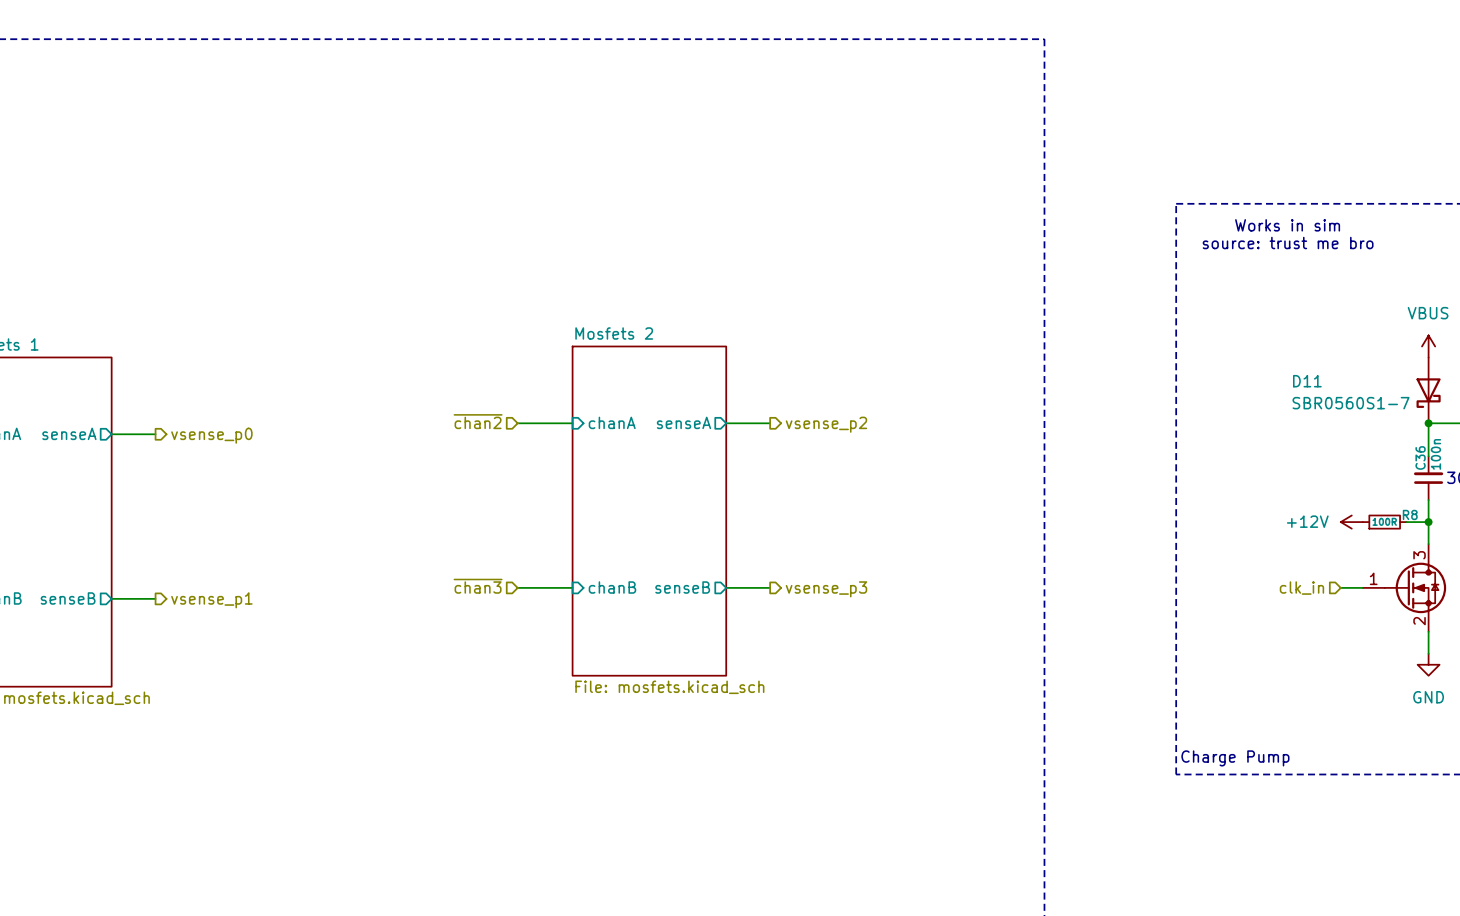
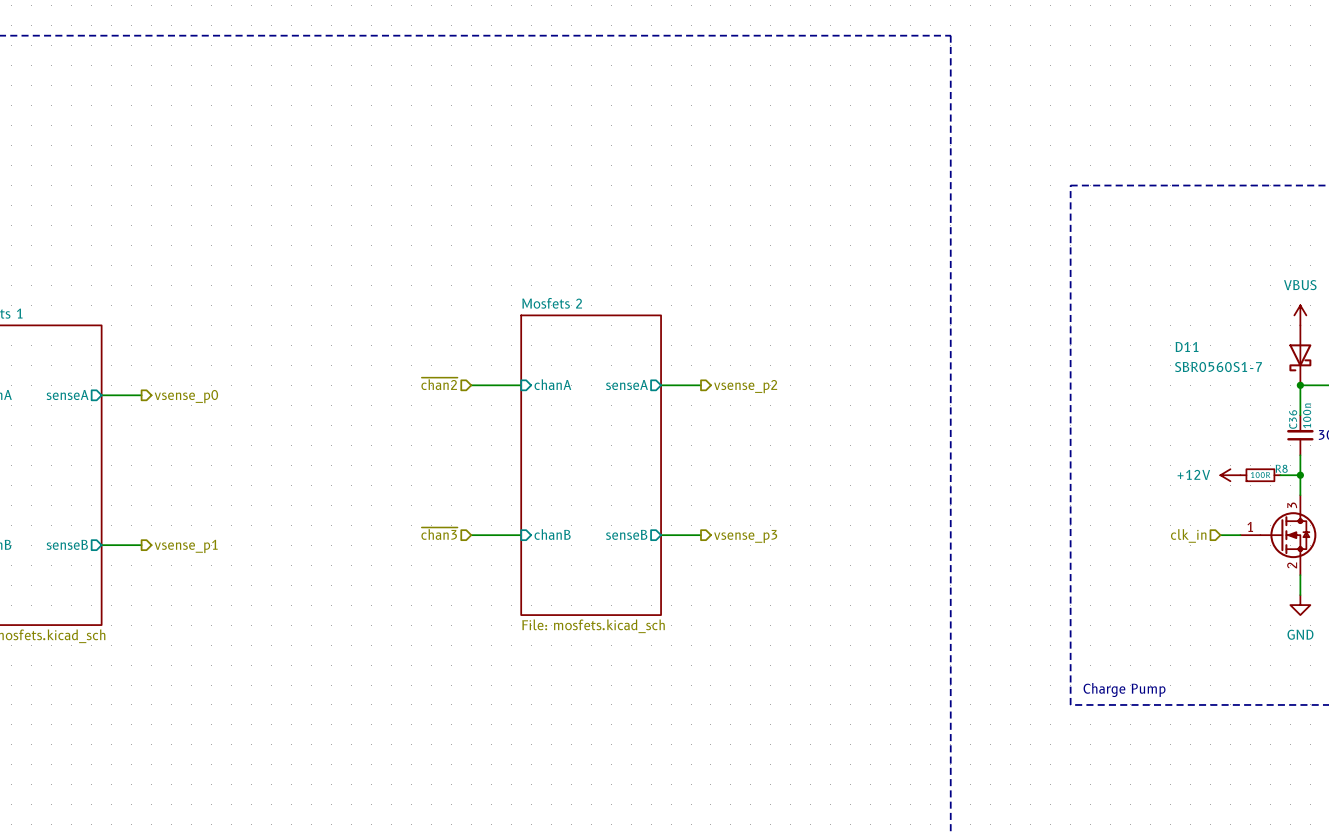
text: Works in sim (1287, 225) -> none
text: source: trust me bro (1288, 243) -> none

